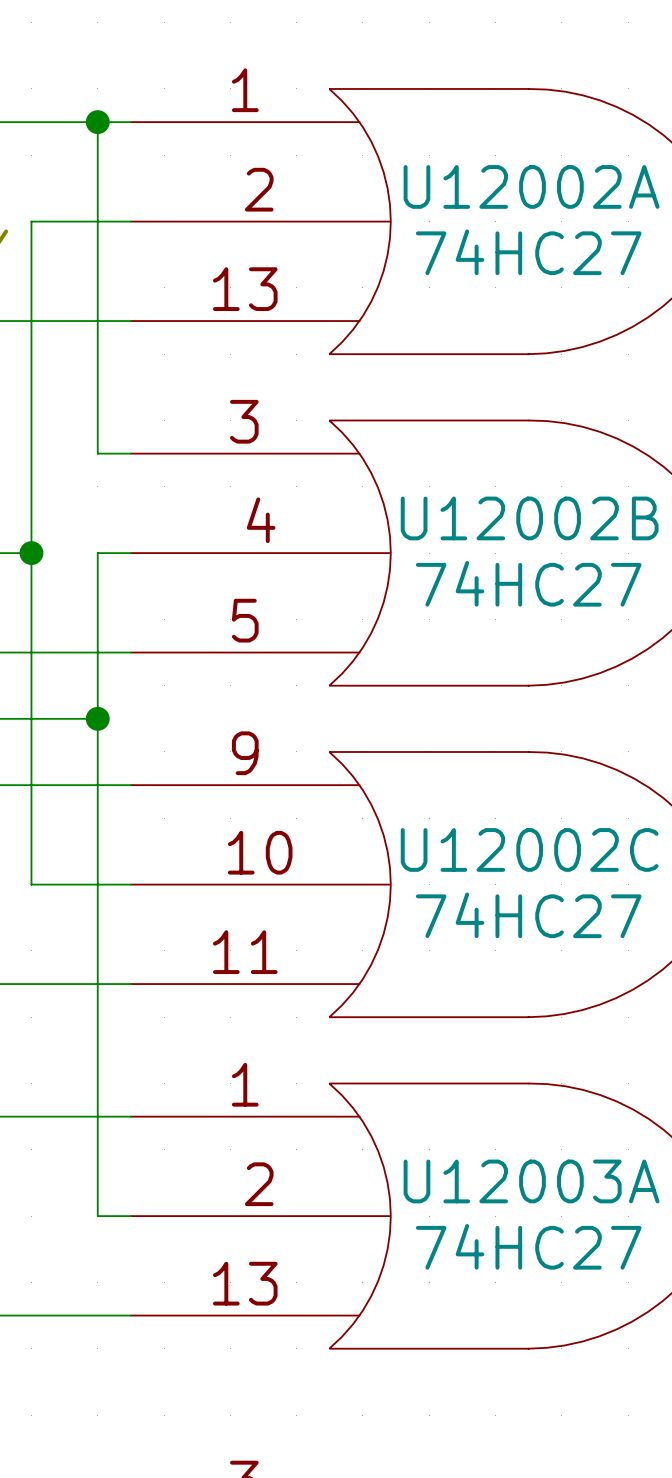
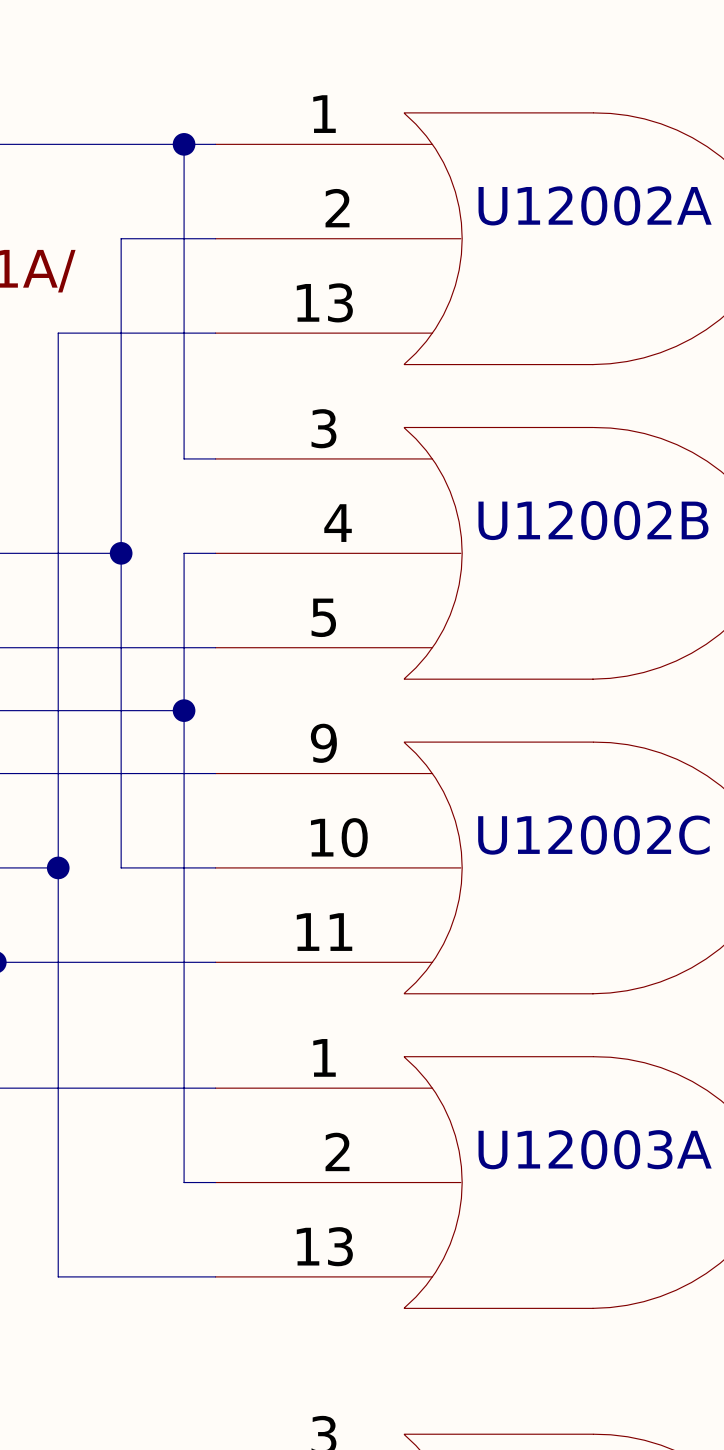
U12002A value: 74HC27 (528, 252) -> none
U12002B value: 74HC27 (528, 583) -> none
U12002C value: 74HC27 (528, 915) -> none
U12003A value: 74HC27 (528, 1246) -> none

